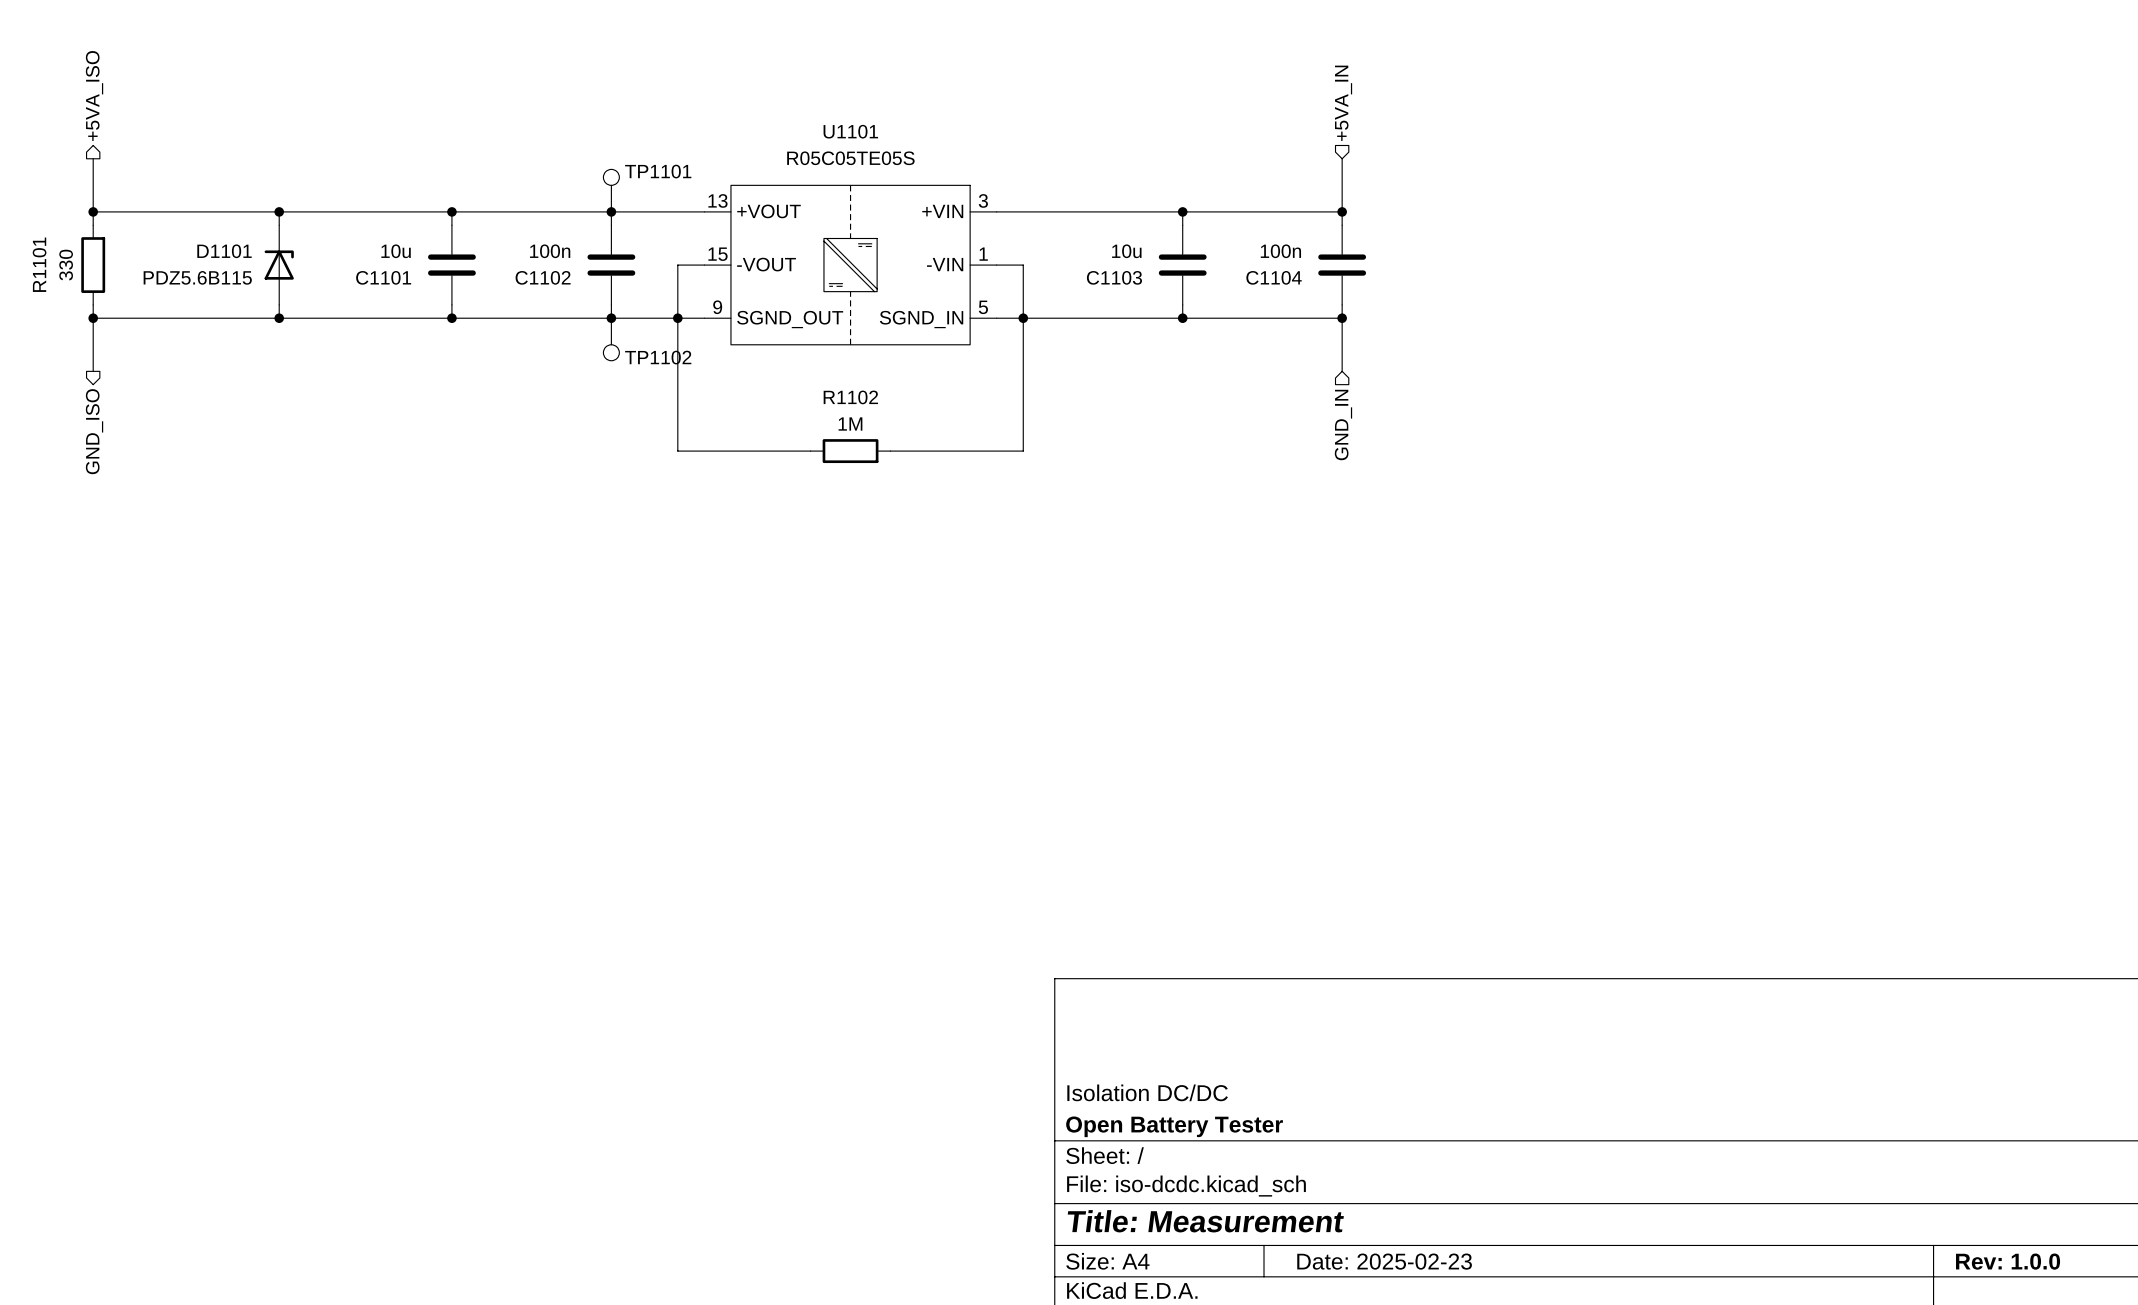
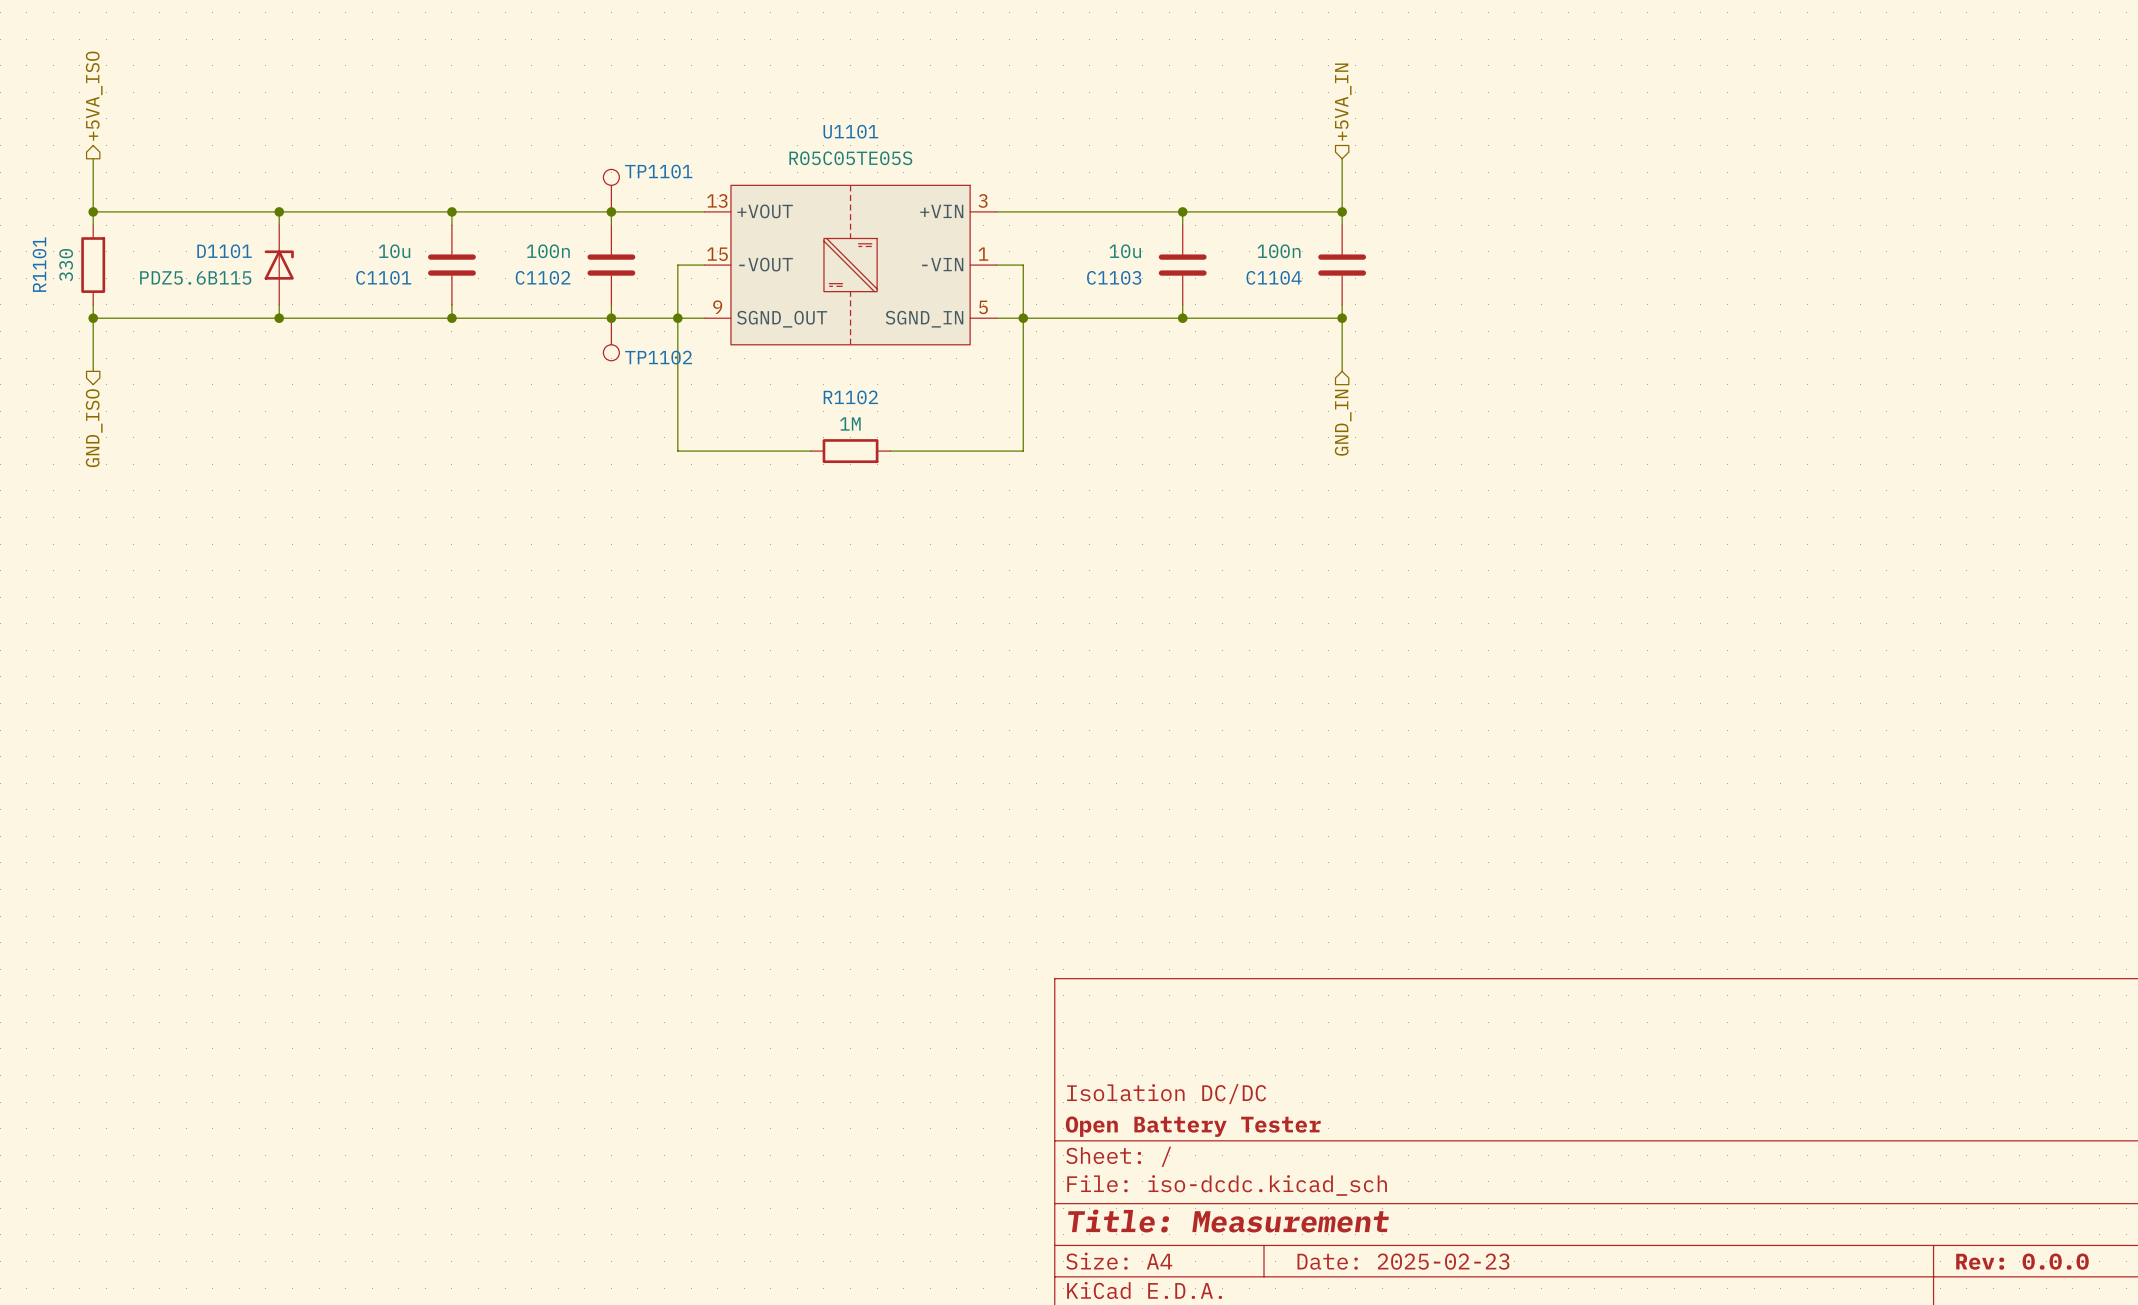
title block: Rev: 1.0.0 (2008, 1261) -> Rev: 0.0.0 (2022, 1261)

